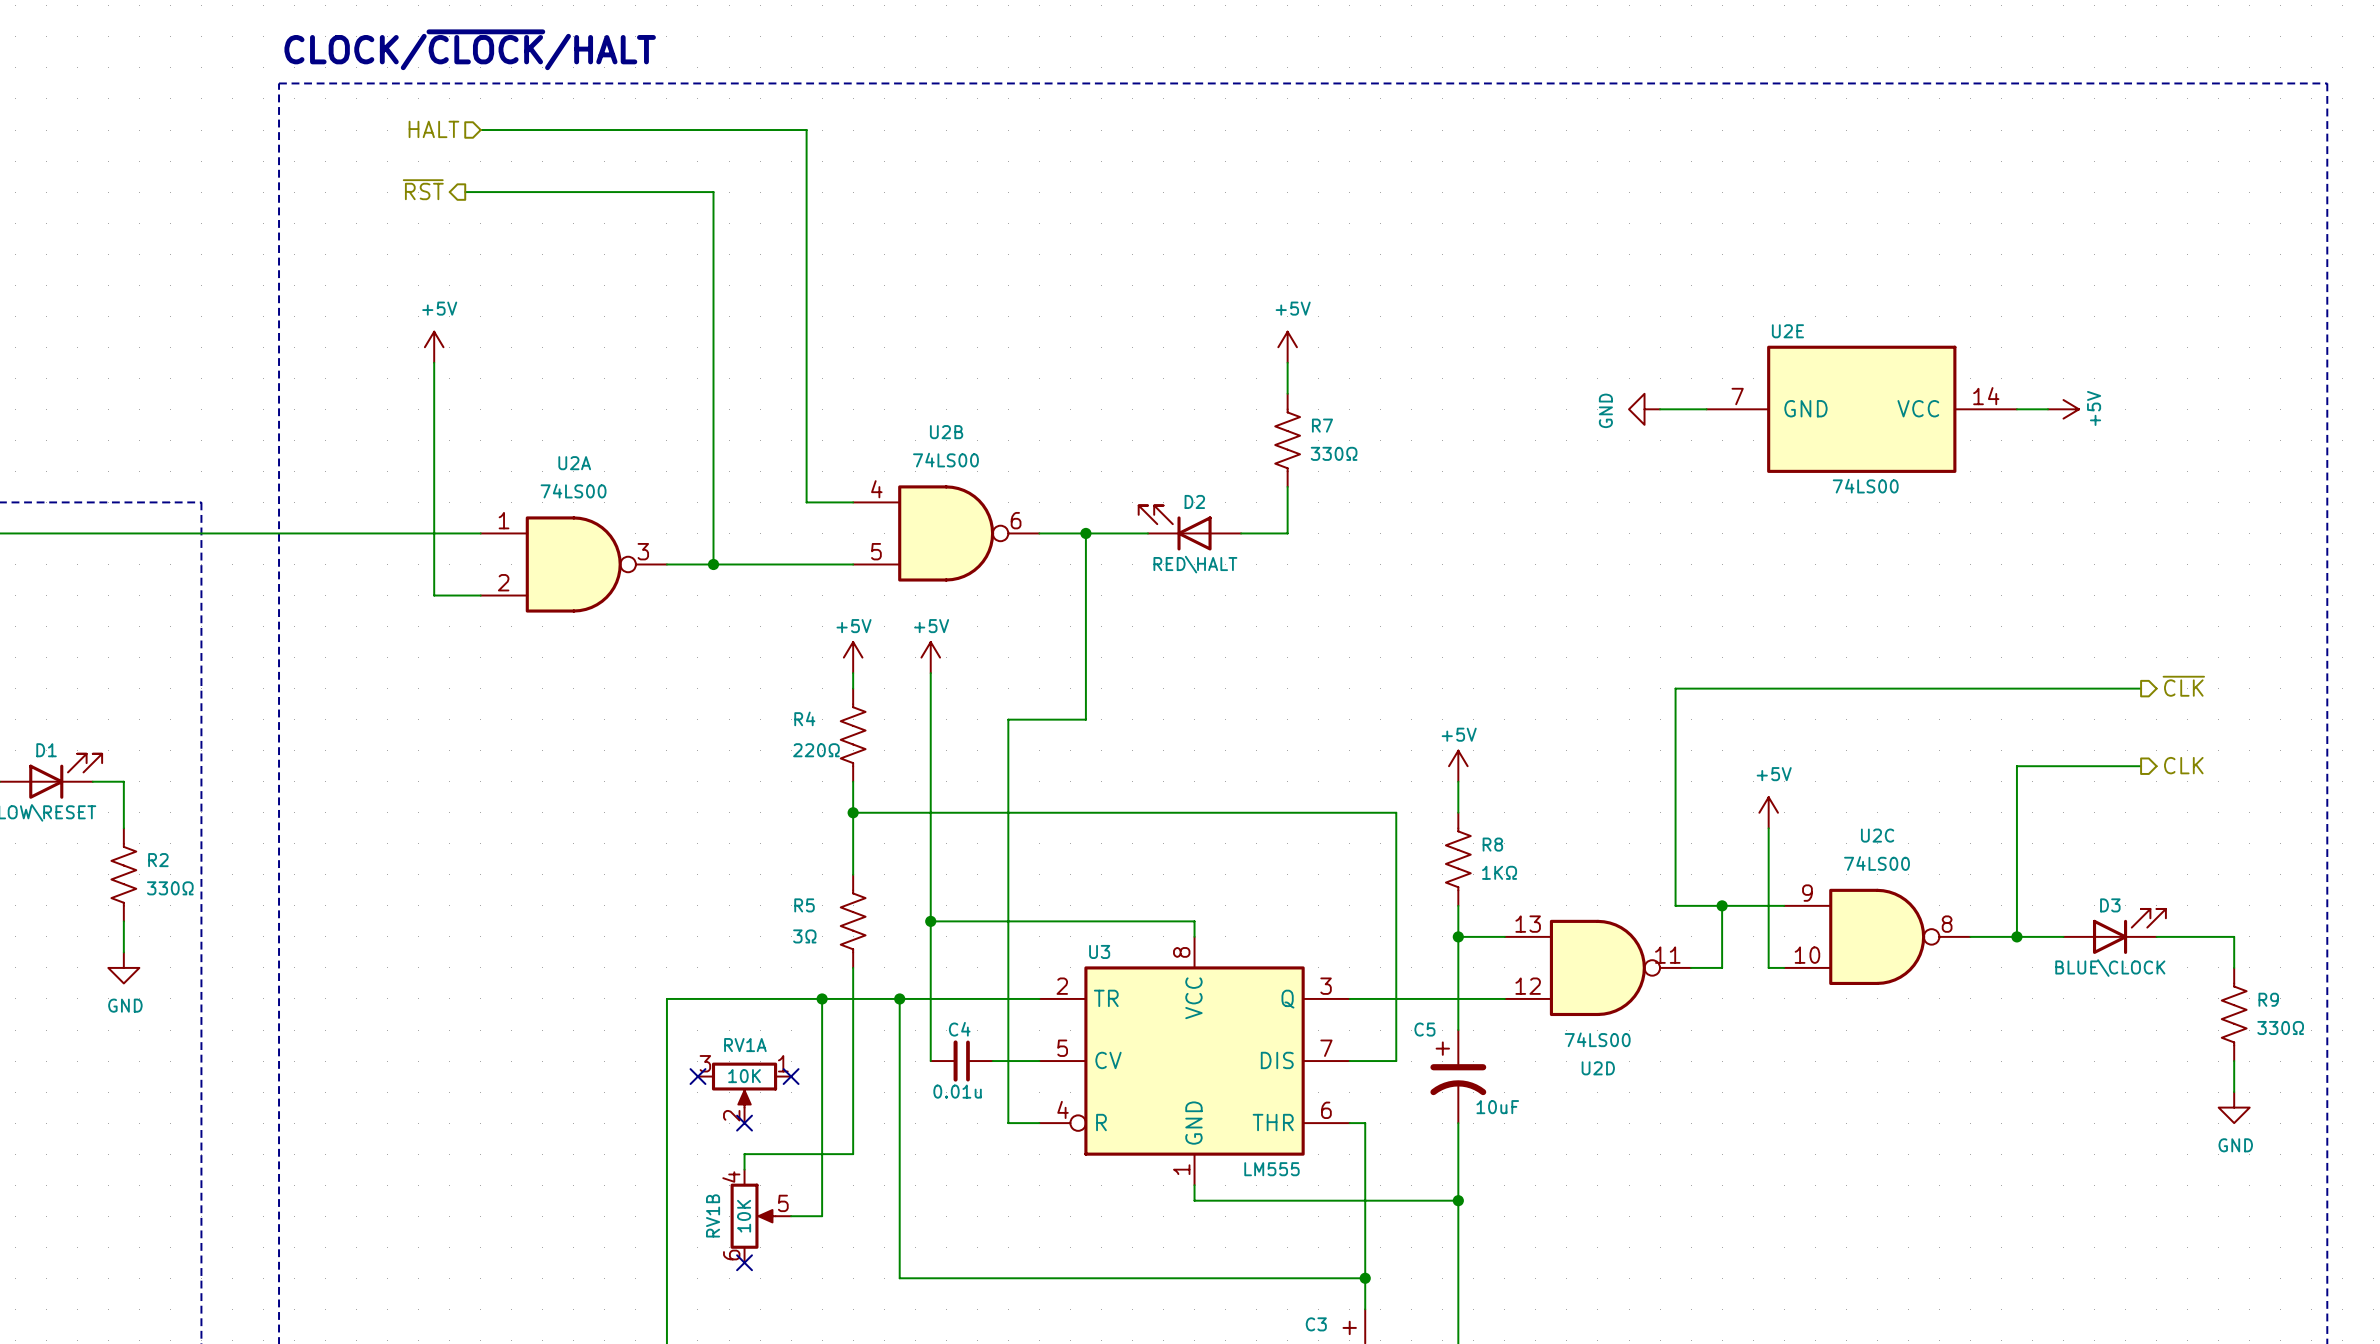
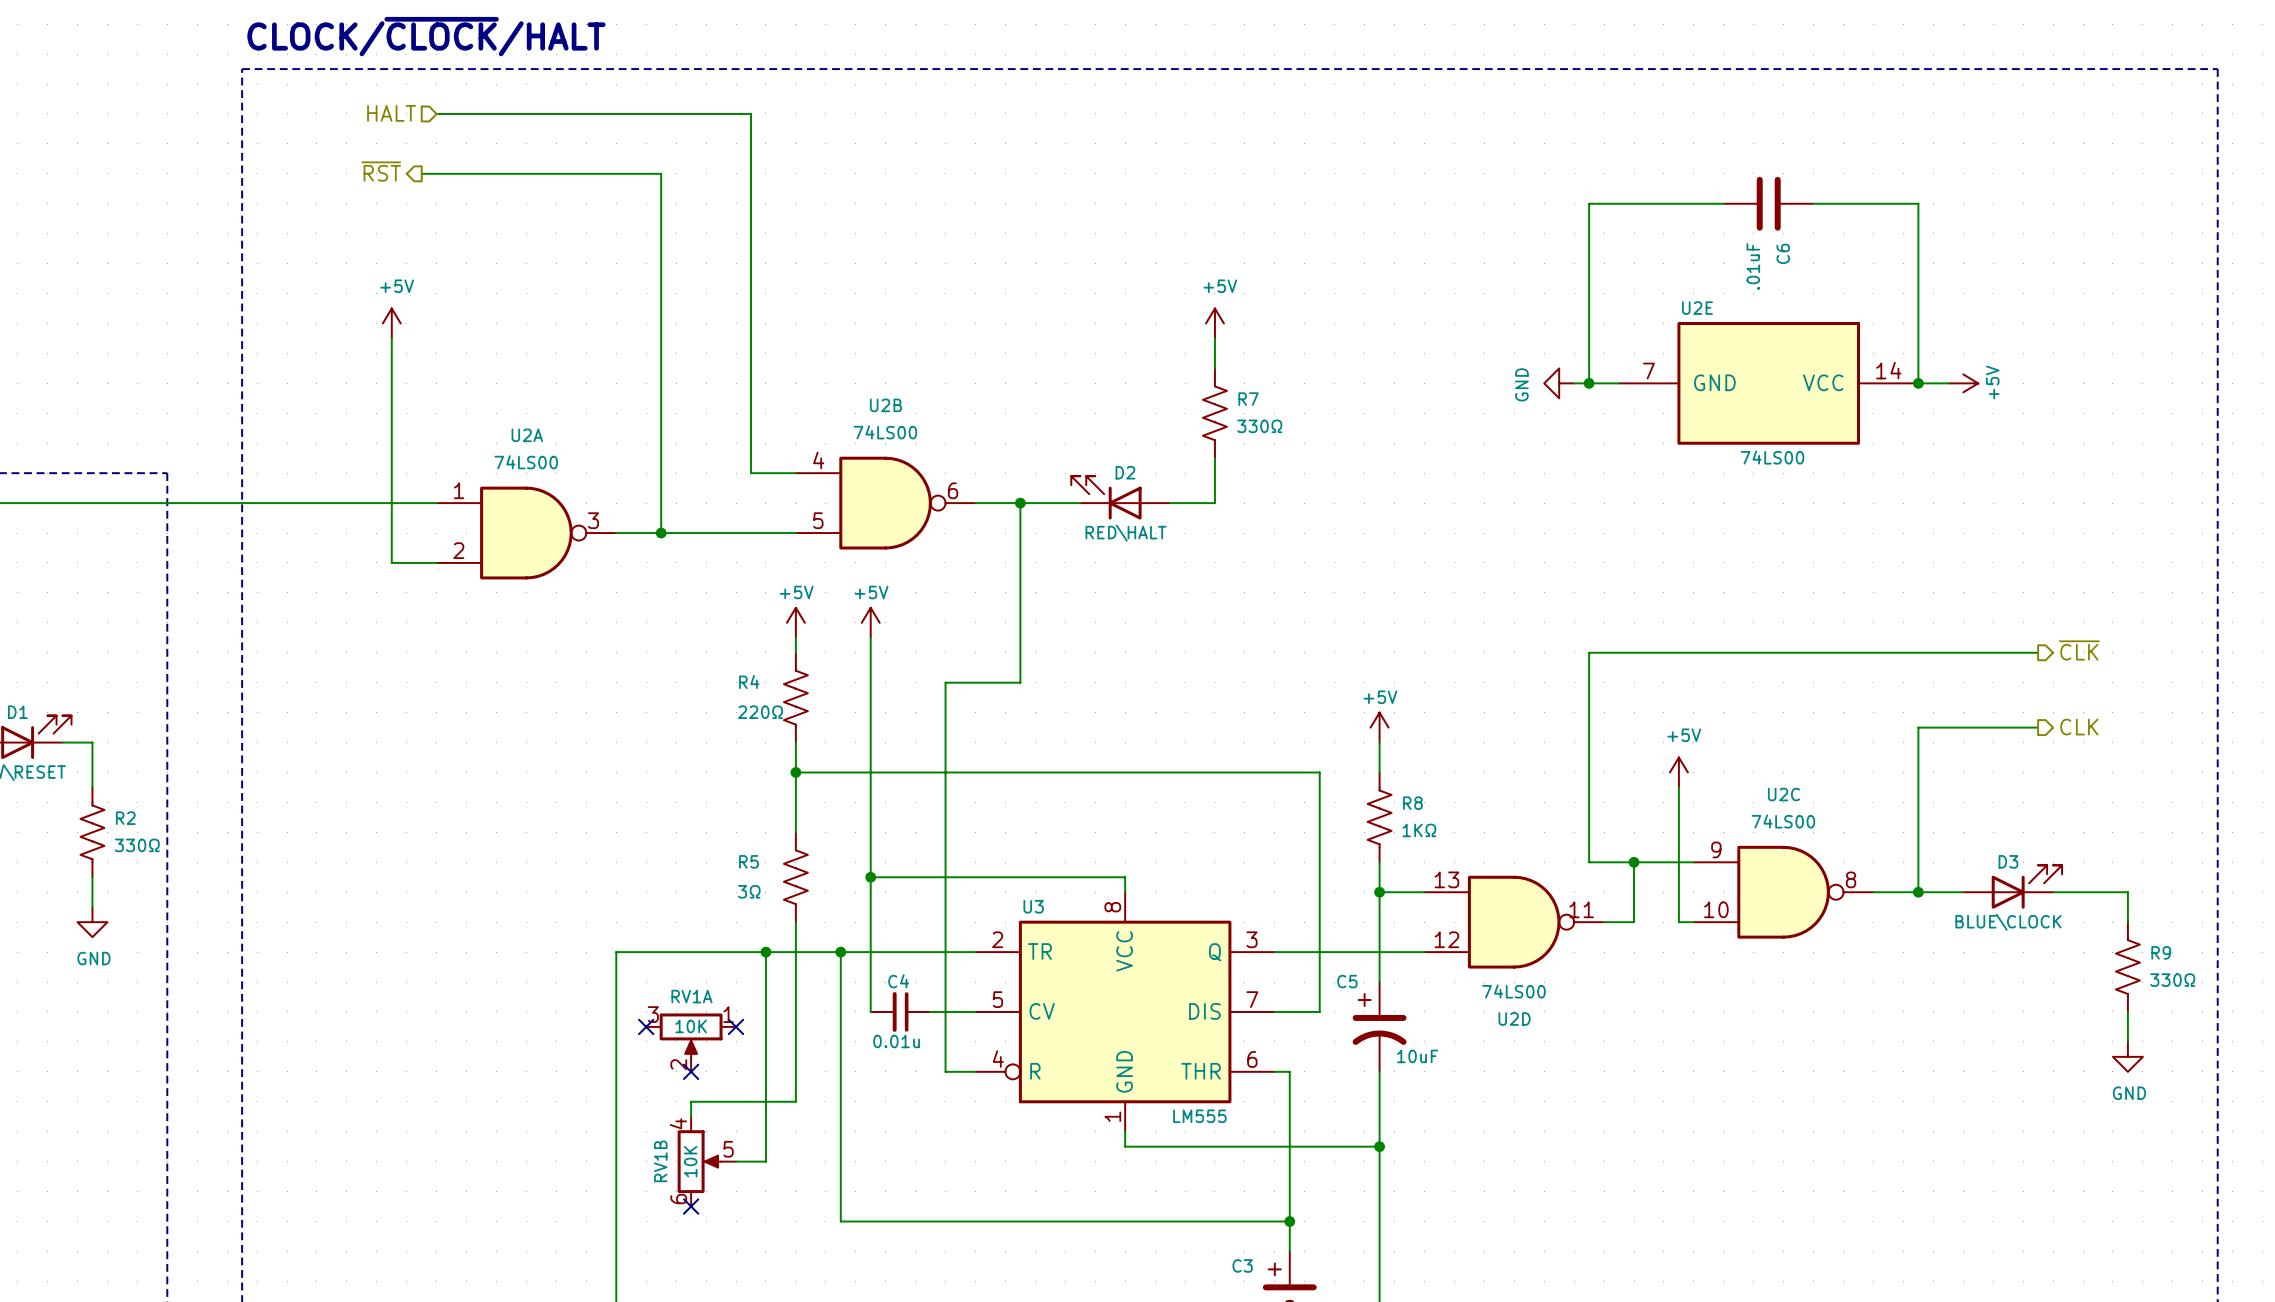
wire: none -> (1723, 203) (1589, 203) (1589, 383)
C6: none -> .01uF (1768, 203)
wire: none -> (1813, 203) (1918, 203) (1918, 383)
junction: none -> (1589, 383)
junction: none -> (1918, 383)

